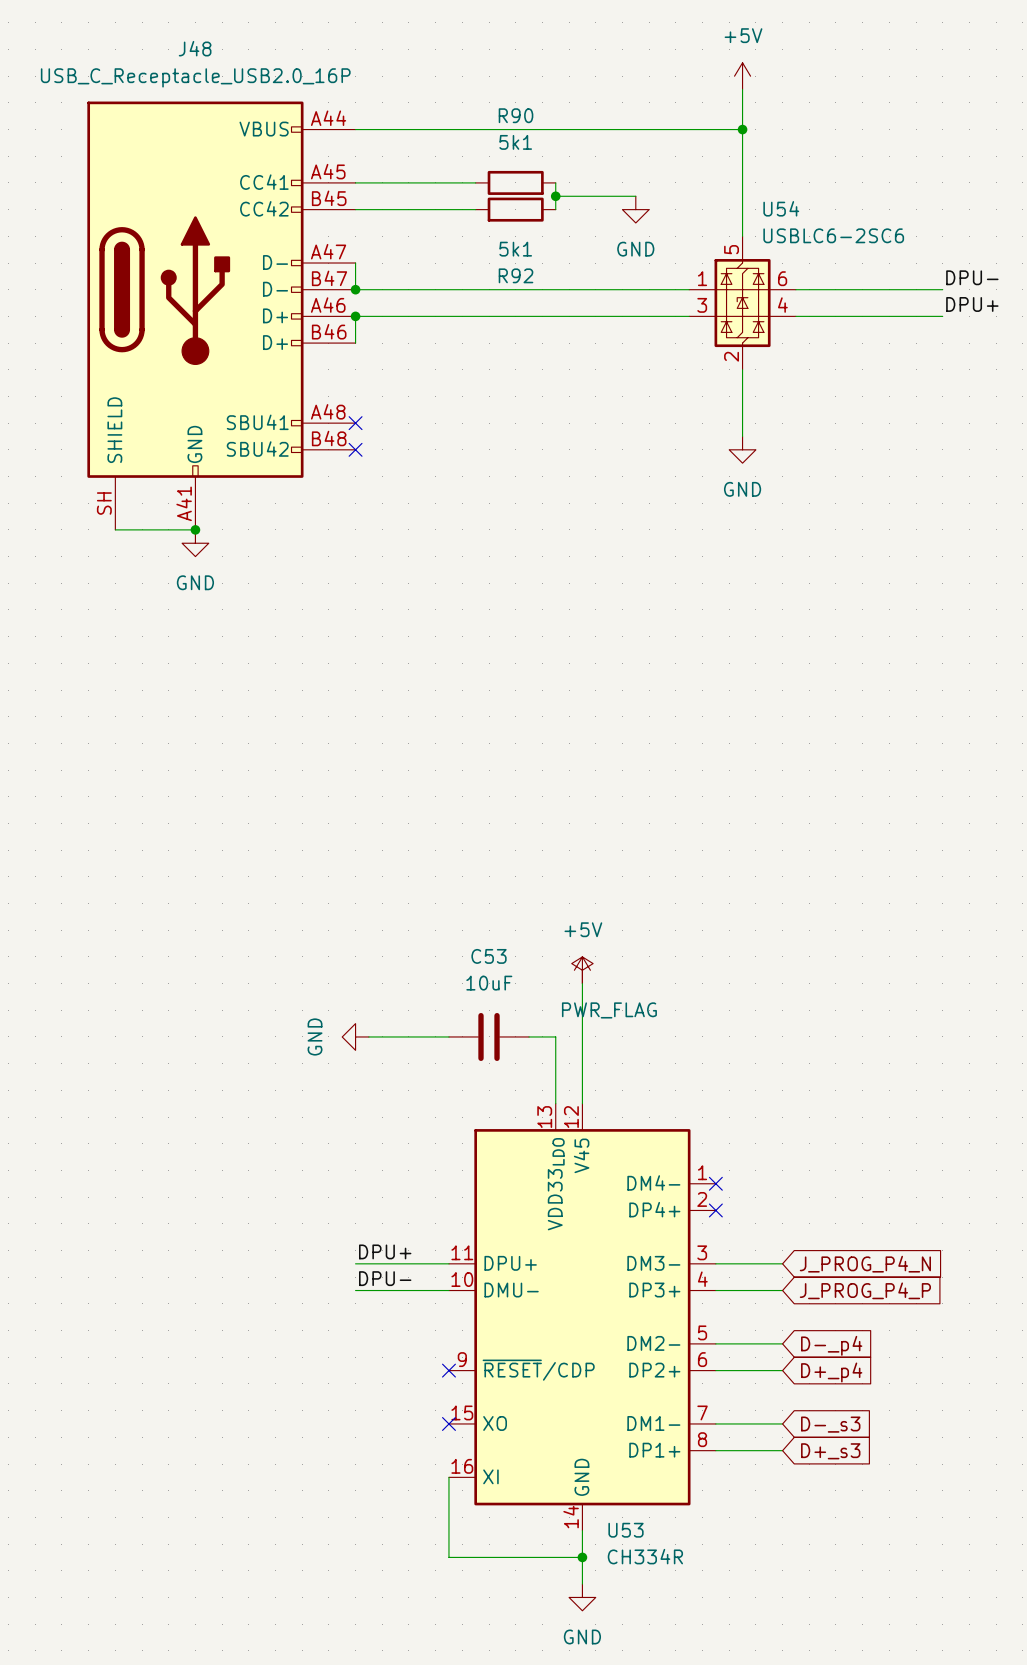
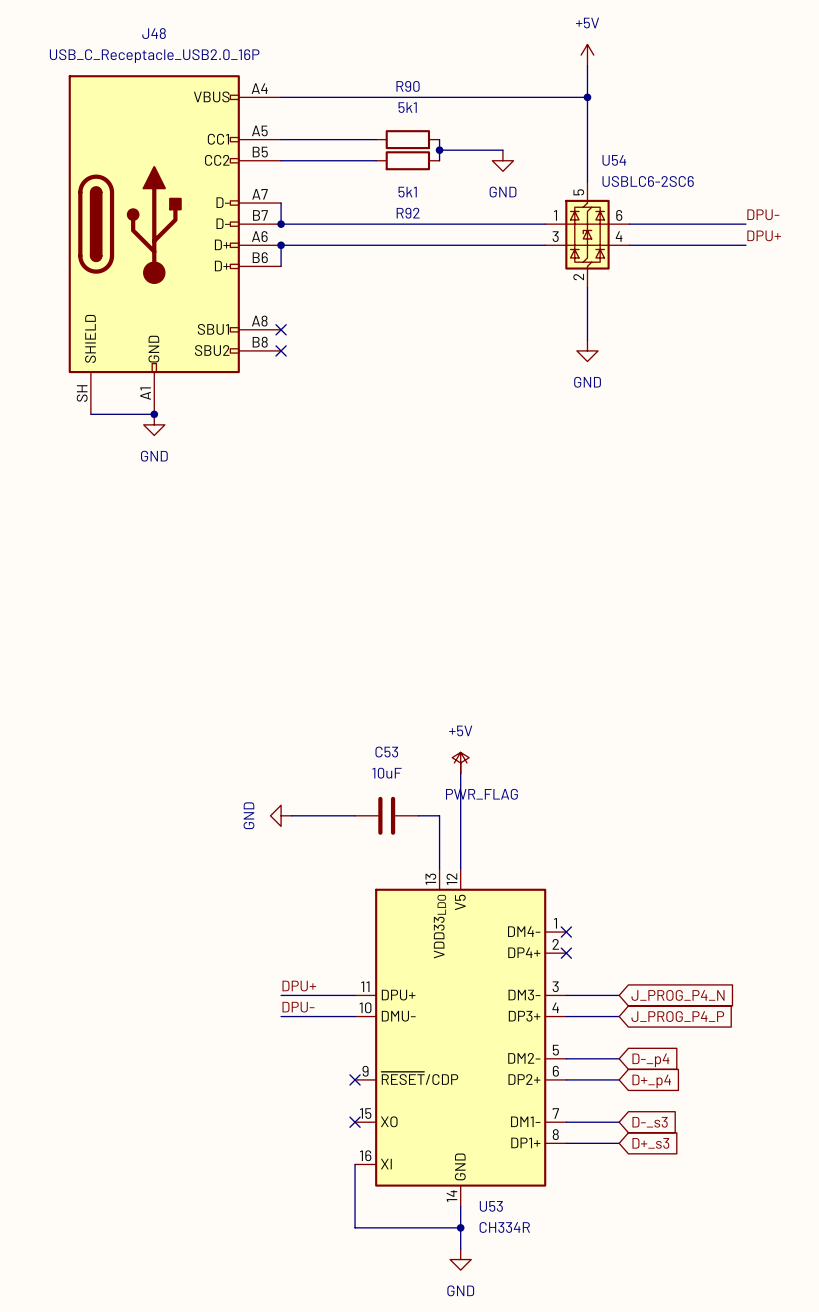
J48 symbol: [87, 101, 356, 530] -> [68, 75, 282, 415]
U53 pin name: V45 (581, 1155) -> V5 (460, 902)

